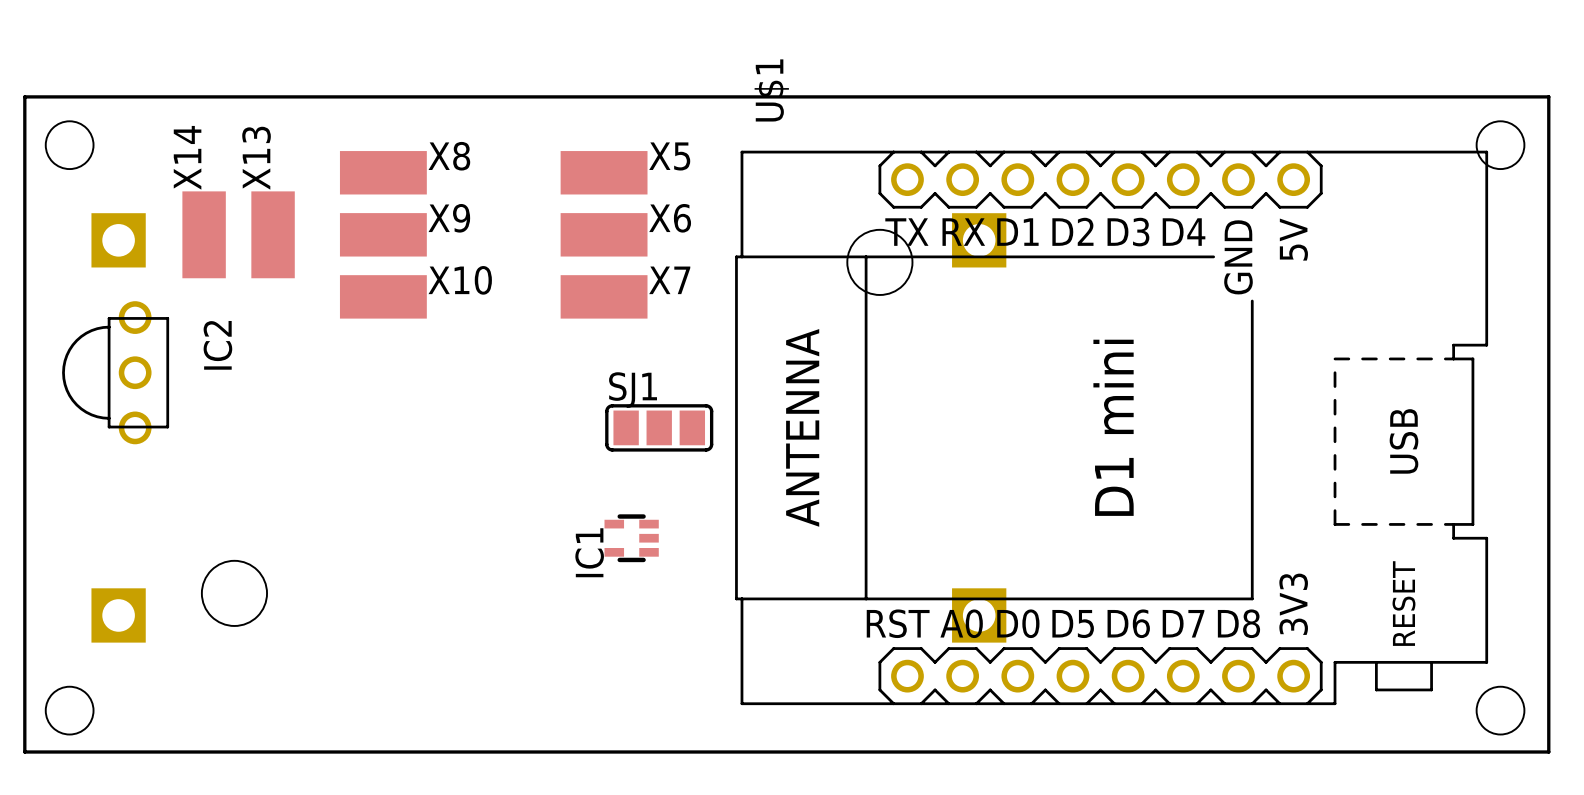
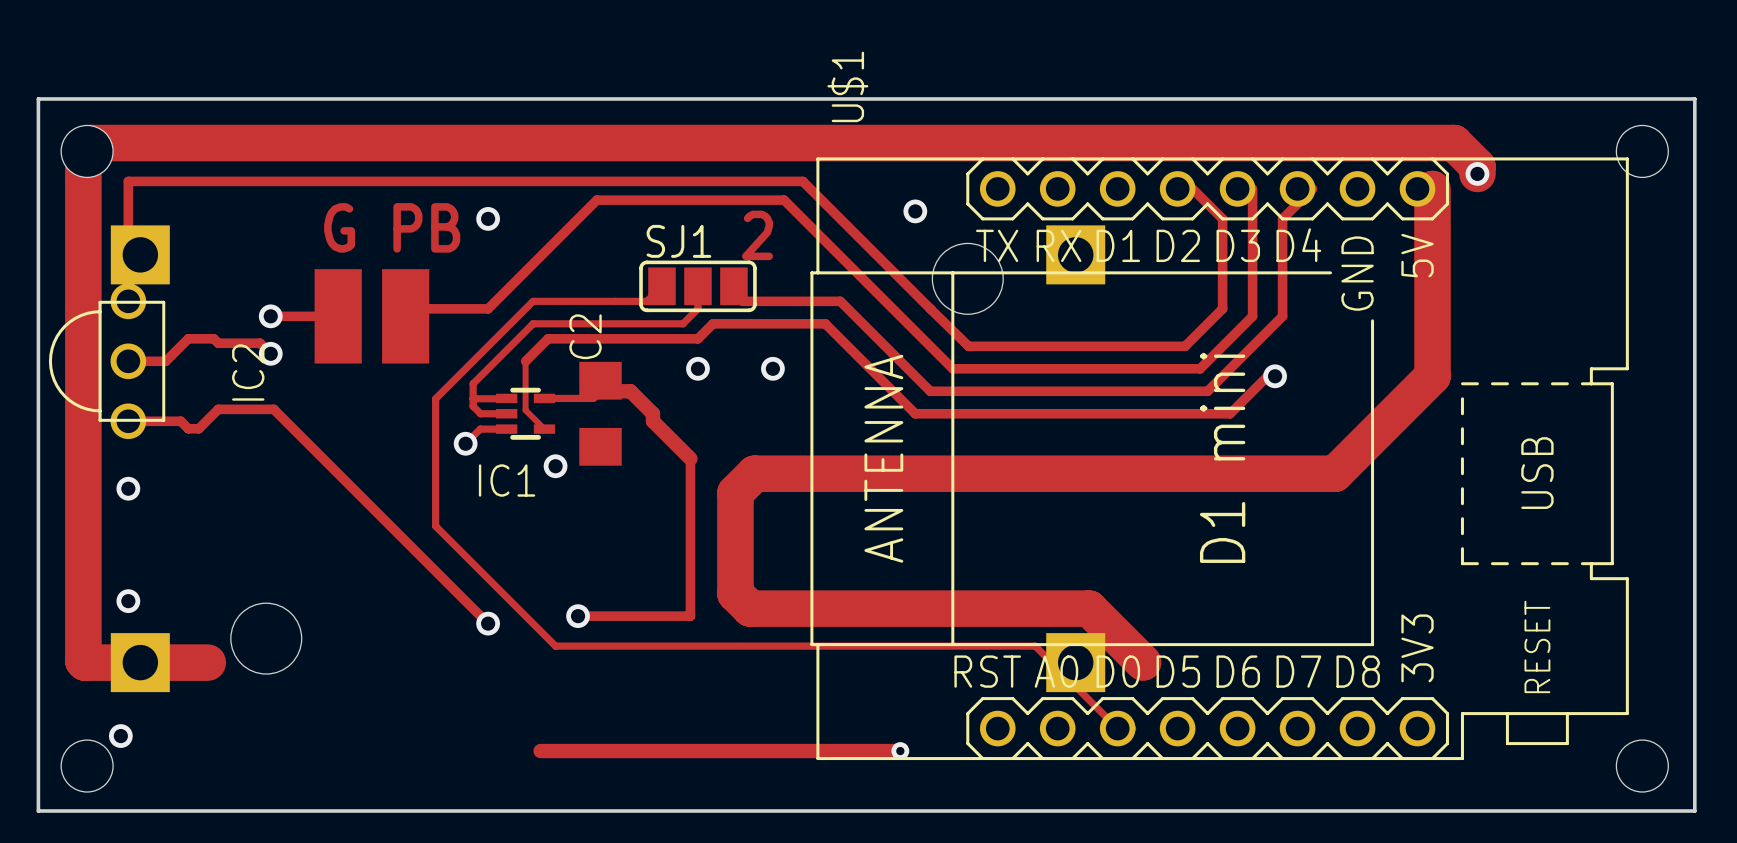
track: none -> (1477, 173) (1477, 166) (1454, 143) (90, 143) (83, 150) (83, 661) (207, 662)
via: none -> (1477, 173)
X8: (383, 172) -> none
X5: (604, 172) -> none
track: none -> (1192, 188) (1222, 218) (1222, 308) (1185, 346) (968, 346) (802, 181) (128, 181) (128, 301)
track: none -> (1252, 188) (1252, 316) (1200, 368) (952, 368) (784, 200) (596, 200) (488, 308) (413, 308) (405, 316)
track: none -> (1312, 188) (1282, 218) (1282, 316) (1207, 391) (930, 391) (840, 301) (742, 301) (733, 286)
track: none -> (1432, 188) (1432, 376) (1335, 473) (754, 473) (735, 492) (735, 593) (750, 608) (1089, 608) (1143, 662)
via: none -> (915, 211)
via: none -> (488, 218)
text: none -> G (339, 227)
text: none -> PB (426, 227)
text: none -> 2 (757, 235)
X14: (204, 234) -> none
X13: (273, 234) -> none
X9: (383, 234) -> none
X6: (604, 234) -> none
track: none -> (661, 286) (647, 301) (533, 301) (435, 398) (435, 526) (555, 646) (1035, 646) (1117, 728) (1132, 728)
track: none -> (697, 286) (697, 308) (682, 323) (533, 323) (473, 383) (473, 406) (480, 413) (506, 413)
track: none -> (270, 316) (338, 316)
via: none -> (270, 316)
part: none -> (338, 316)
part: none -> (405, 316)
X10: (383, 296) -> none
X7: (604, 296) -> none
track: none -> (270, 353) (260, 343) (218, 343) (213, 338) (188, 338) (165, 361) (128, 361)
via: none -> (270, 353)
via: none -> (697, 368)
via: none -> (772, 368)
track: none -> (1275, 376) (1267, 376) (1230, 413) (915, 413) (825, 323) (712, 323) (697, 338) (548, 338) (525, 361) (525, 410) (544, 429)
via: none -> (1275, 376)
track: none -> (600, 391) (593, 398) (544, 398)
track: none -> (600, 391) (630, 391) (653, 413) (653, 421) (690, 458) (690, 616) (578, 616)
IC2 position: (115, 372) -> (107, 361)
track: none -> (506, 398) (473, 398)
C2: none -> (600, 413)
track: none -> (128, 421) (180, 421) (188, 428) (198, 428) (218, 409) (273, 409) (488, 623)
track: none -> (506, 429) (480, 429) (465, 443)
via: none -> (465, 443)
SJ1 position: (659, 427) -> (697, 286)
via: none -> (555, 466)
via: none -> (128, 488)
IC1 rotation: 0° (631, 538) -> 180° (525, 413)
IC1 position: (631, 538) -> (525, 413)
IC1 name position: IC1 (589, 552) -> IC1 (507, 480)
via: none -> (128, 601)
via: none -> (578, 616)
via: none -> (488, 623)
via: none -> (120, 736)
track: none -> (540, 751) (900, 751)
via: none -> (900, 751)

